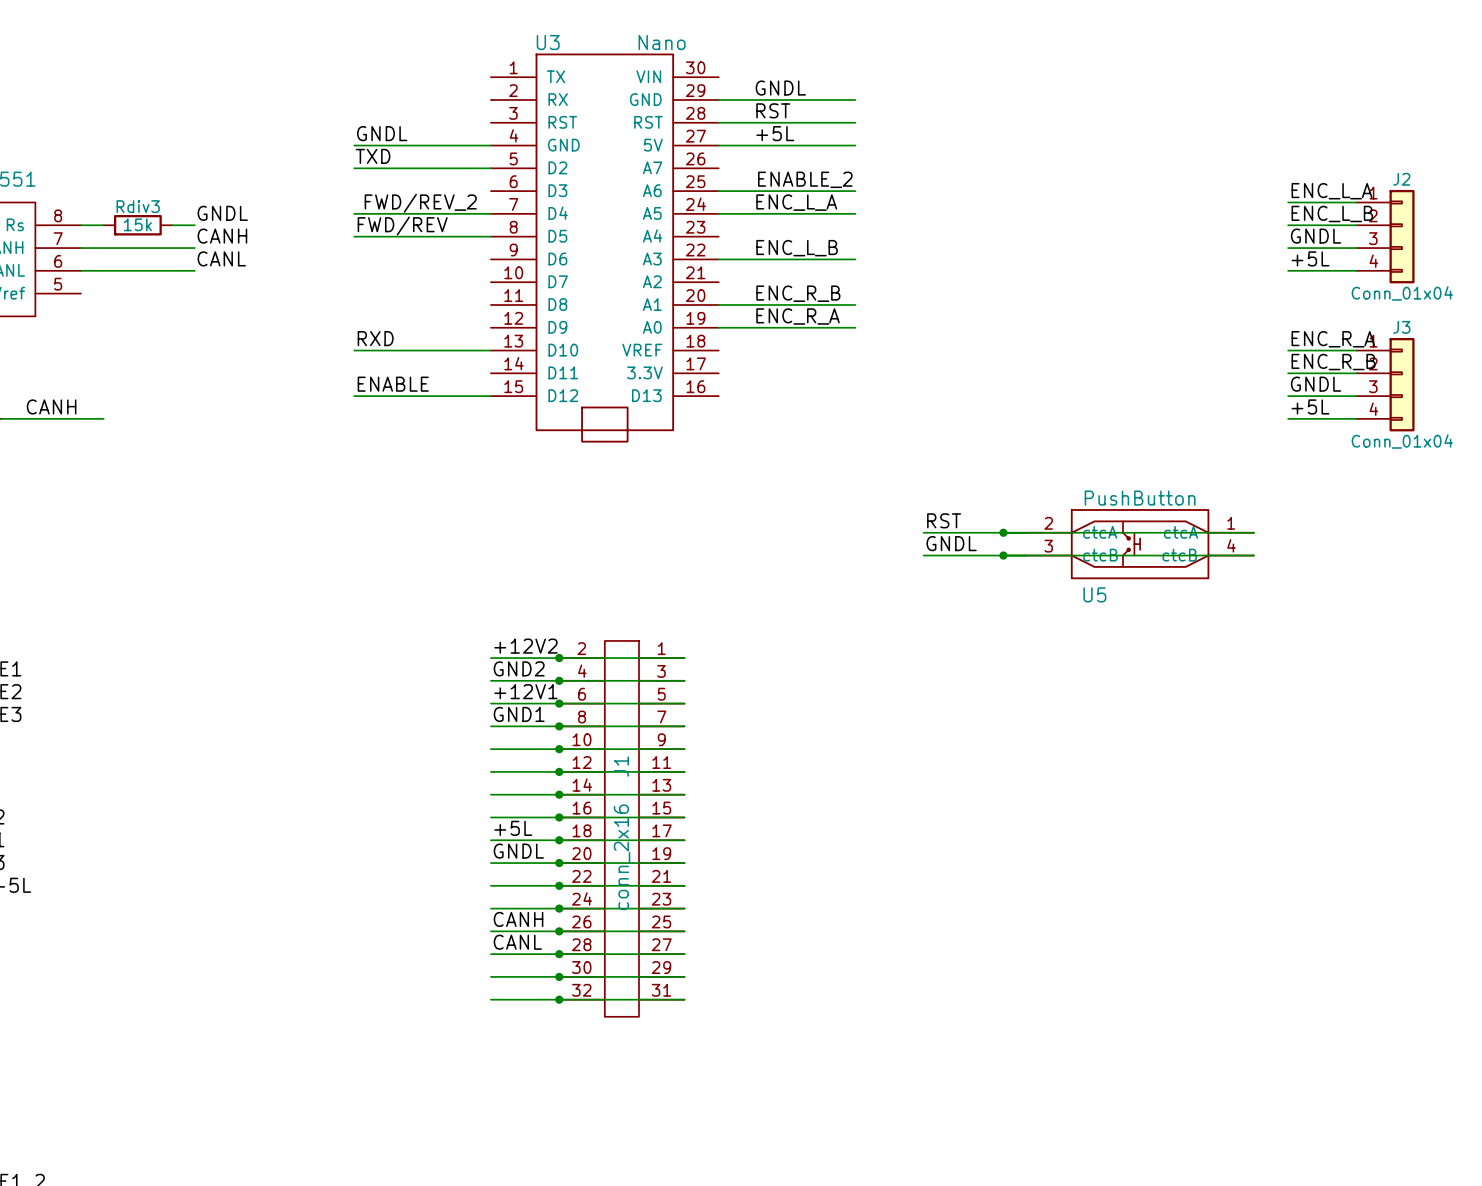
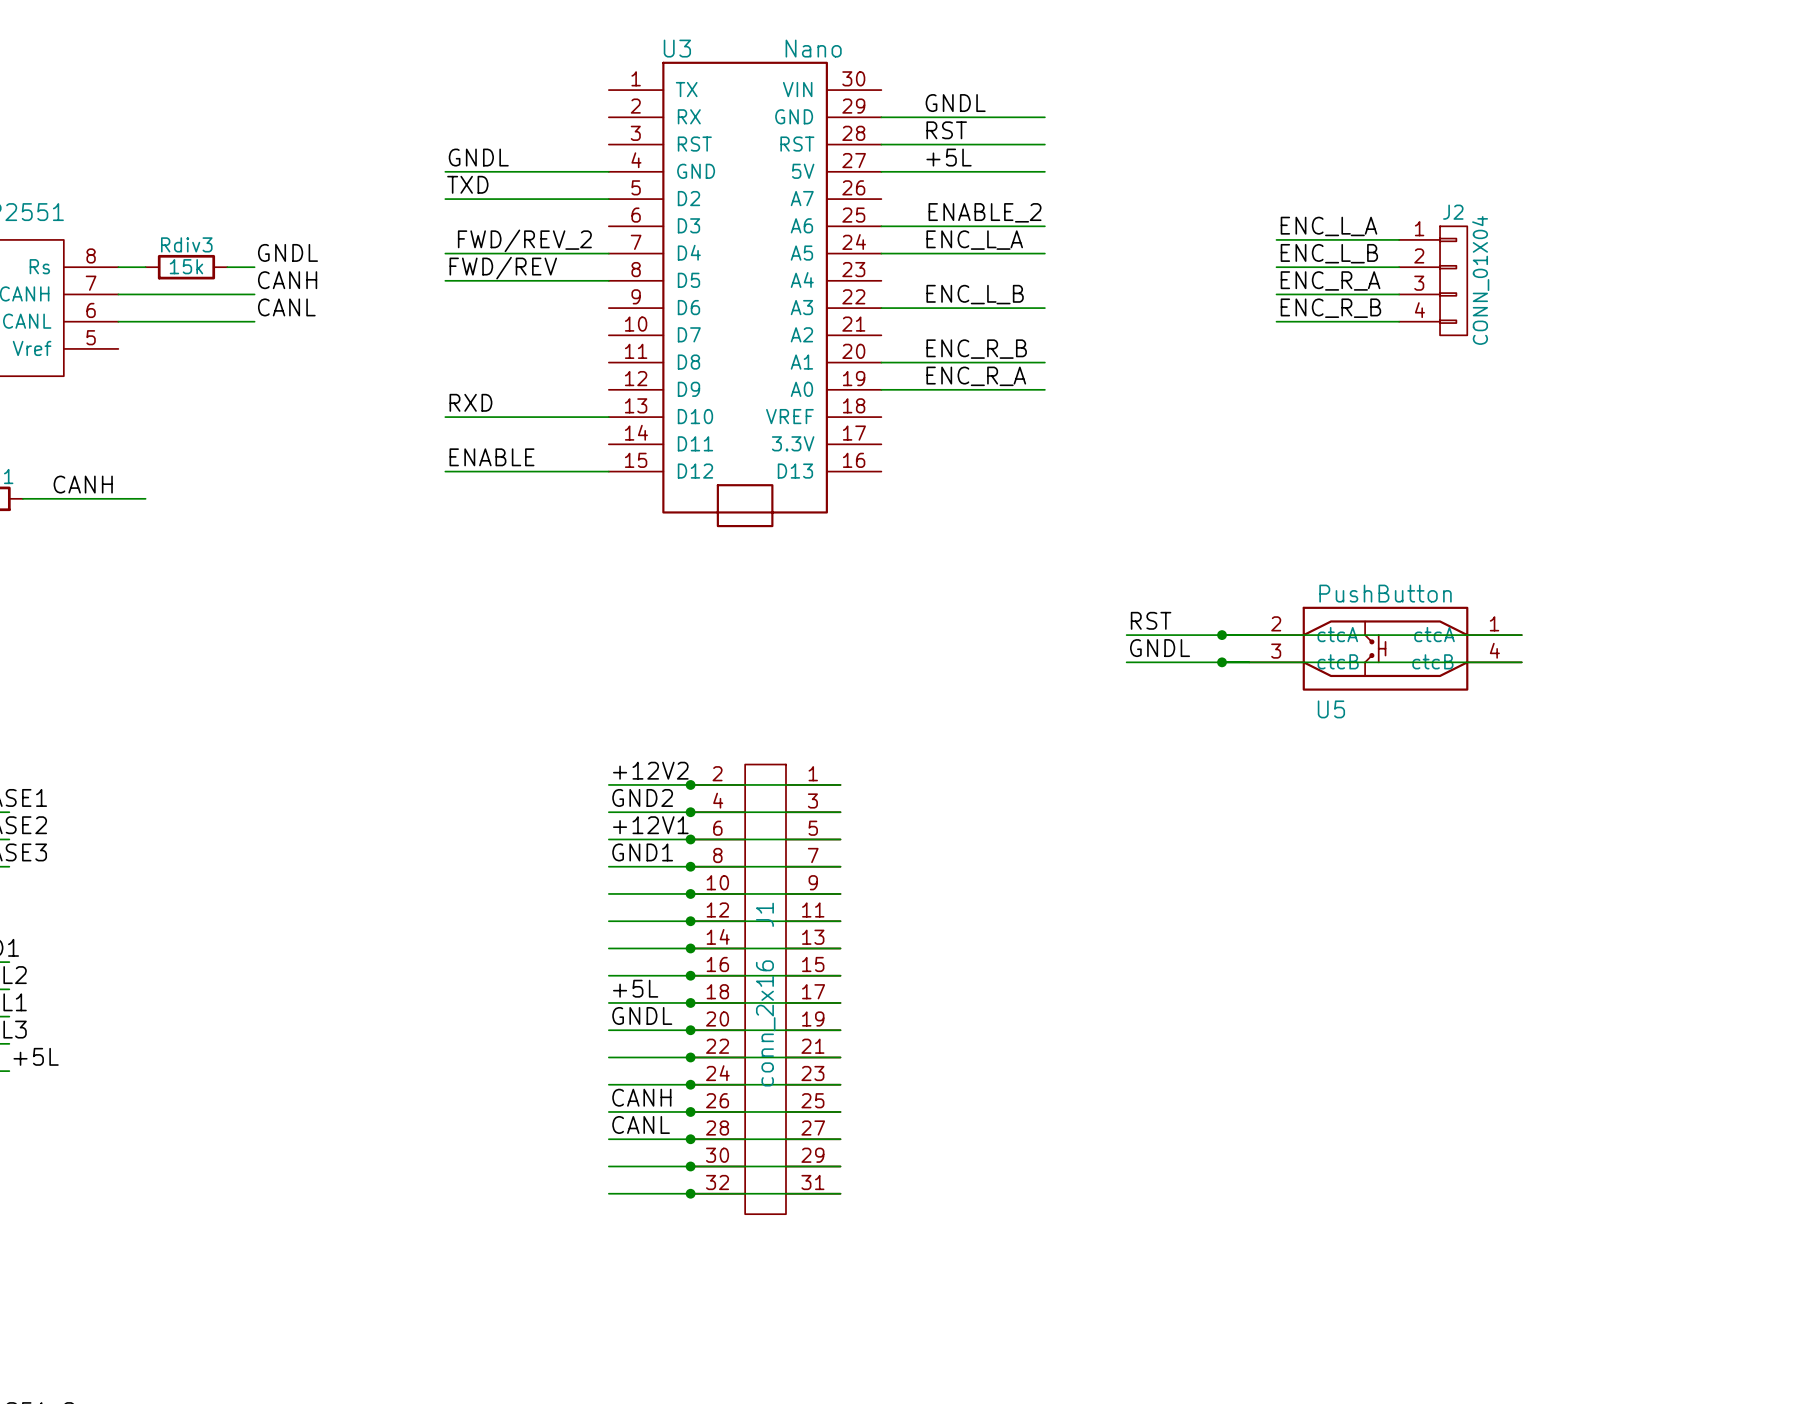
J2 symbol: [1356, 189, 1415, 284] -> [1399, 226, 1468, 336]
label: none -> ENC_L_A (1328, 226)
label: ENC_L_A (1332, 191) -> none
wire: none -> (1276, 239) (1399, 239)
wire: (1288, 202) (1356, 202) -> none
label: none -> ENC_L_B (1329, 253)
label: ENC_L_B (1332, 213) -> none
wire: none -> (1276, 267) (1399, 267)
wire: (1288, 225) (1356, 225) -> none
label: none -> ENC_R_A (1330, 280)
label: GNDL (1316, 236) -> none
wire: none -> (1276, 294) (1399, 294)
wire: (1288, 248) (1356, 248) -> none
label: +5L (1310, 258) -> none
label: none -> ENC_R_B (1330, 308)
wire: none -> (1276, 321) (1399, 321)
wire: (1288, 270) (1356, 270) -> none
J2 value: Conn_01x04 (1402, 293) -> CONN_01X04 (1480, 280)
label: ENC_R_A (1333, 339) -> none
wire: (1288, 350) (1356, 350) -> none
label: ENC_R_B (1333, 362) -> none
wire: (1288, 373) (1356, 373) -> none
label: GNDL (1316, 384) -> none
J3: Conn_01x04 (1385, 384) -> none
wire: (1288, 396) (1356, 396) -> none
label: +5L (1310, 406) -> none
wire: (1288, 418) (1356, 418) -> none

